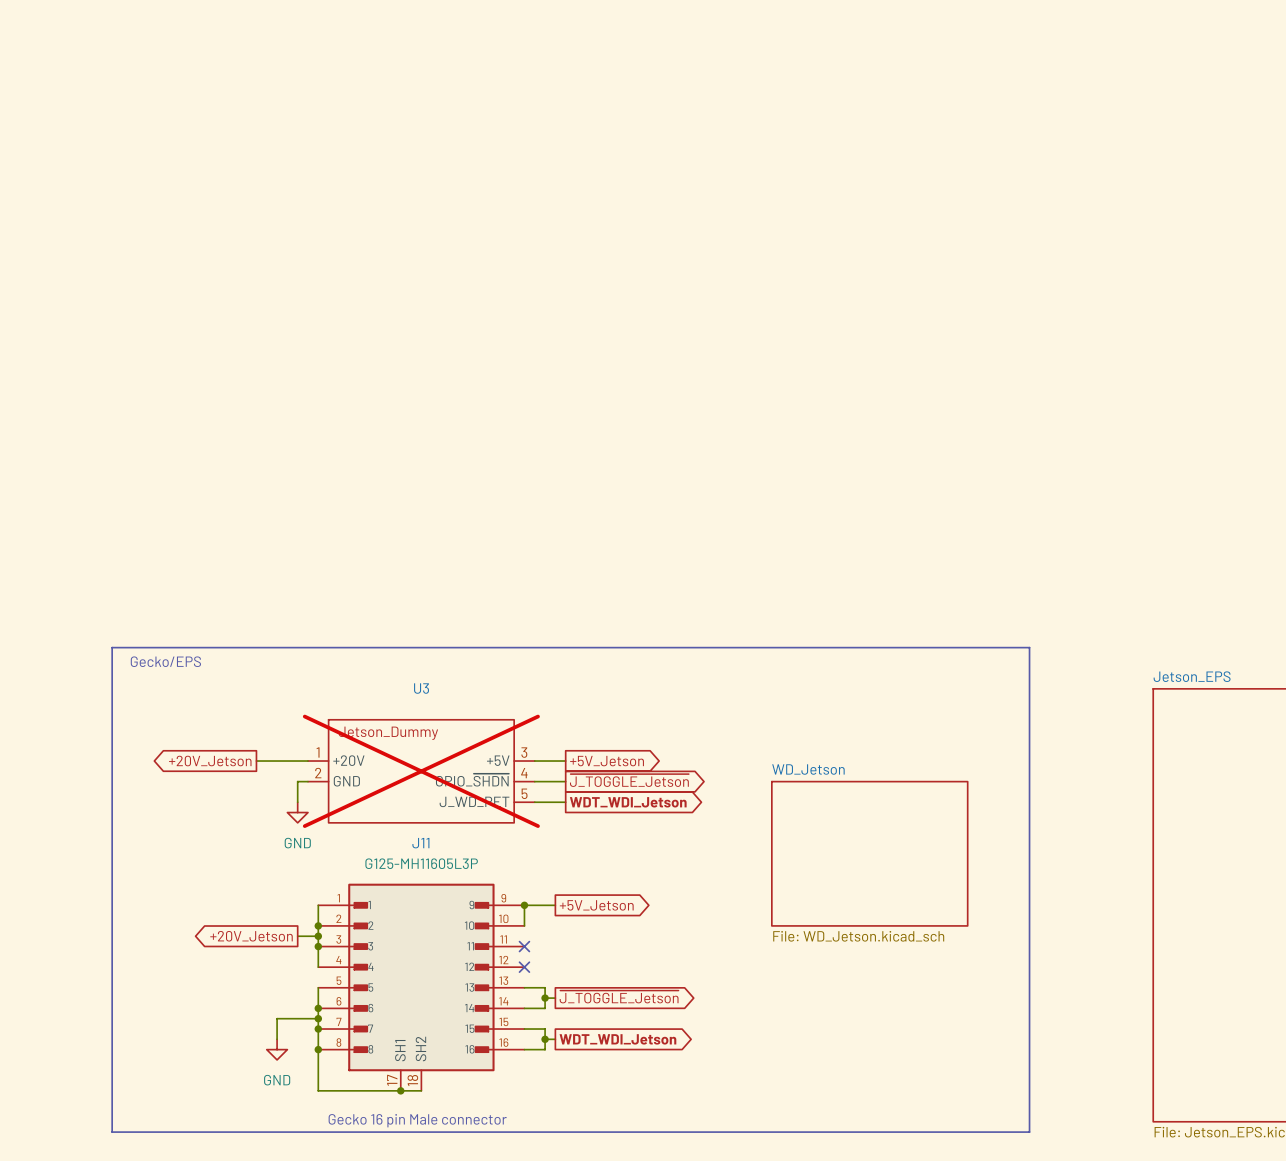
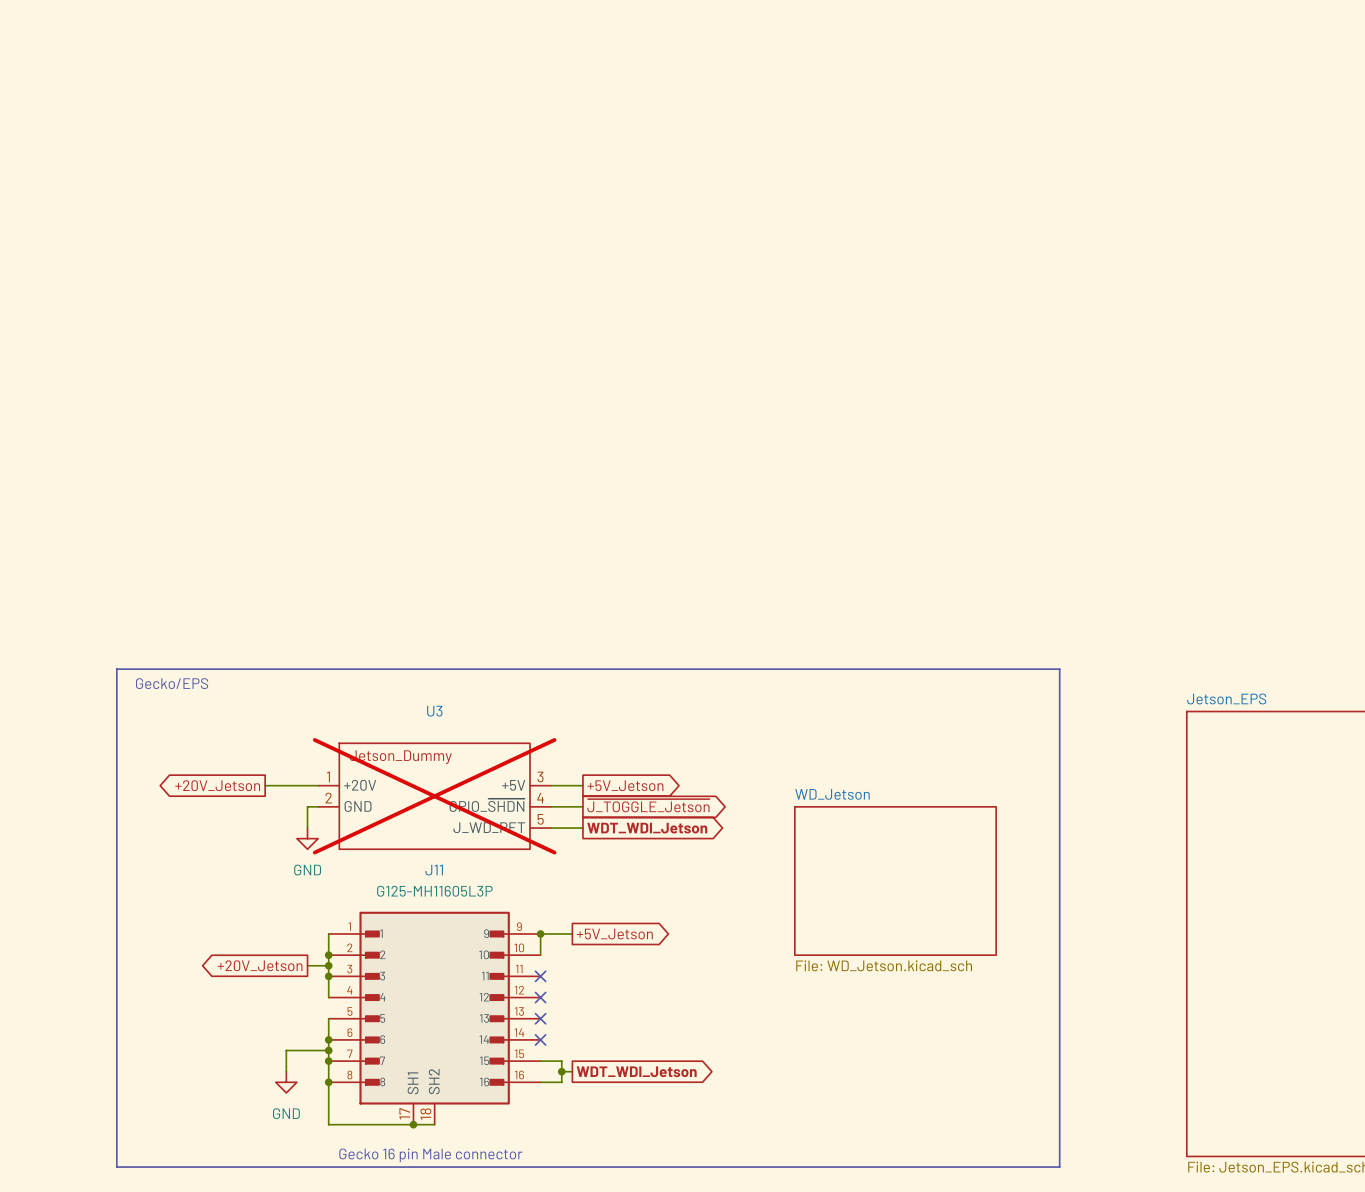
wire: (524, 987) (545, 987) (545, 1008) (524, 1008) -> none
no-connect mark: none -> (540, 1018)
global label: ~{J_TOGGLE_Jetson} (619, 996) -> none
wire: (545, 998) (555, 998) -> none
junction: (545, 998) -> none
no-connect mark: none -> (540, 1039)

